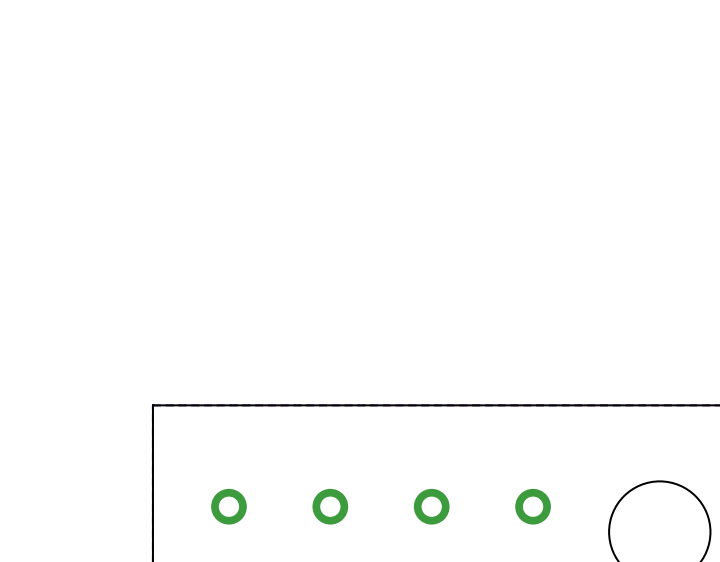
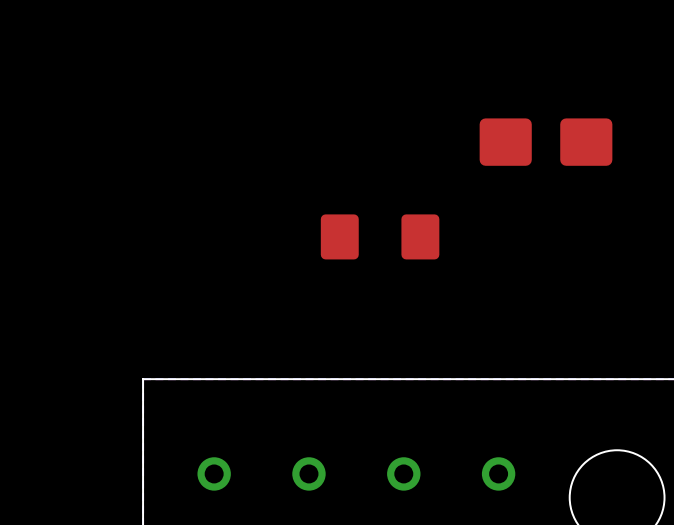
part: none -> (546, 142)
part: none -> (380, 236)

